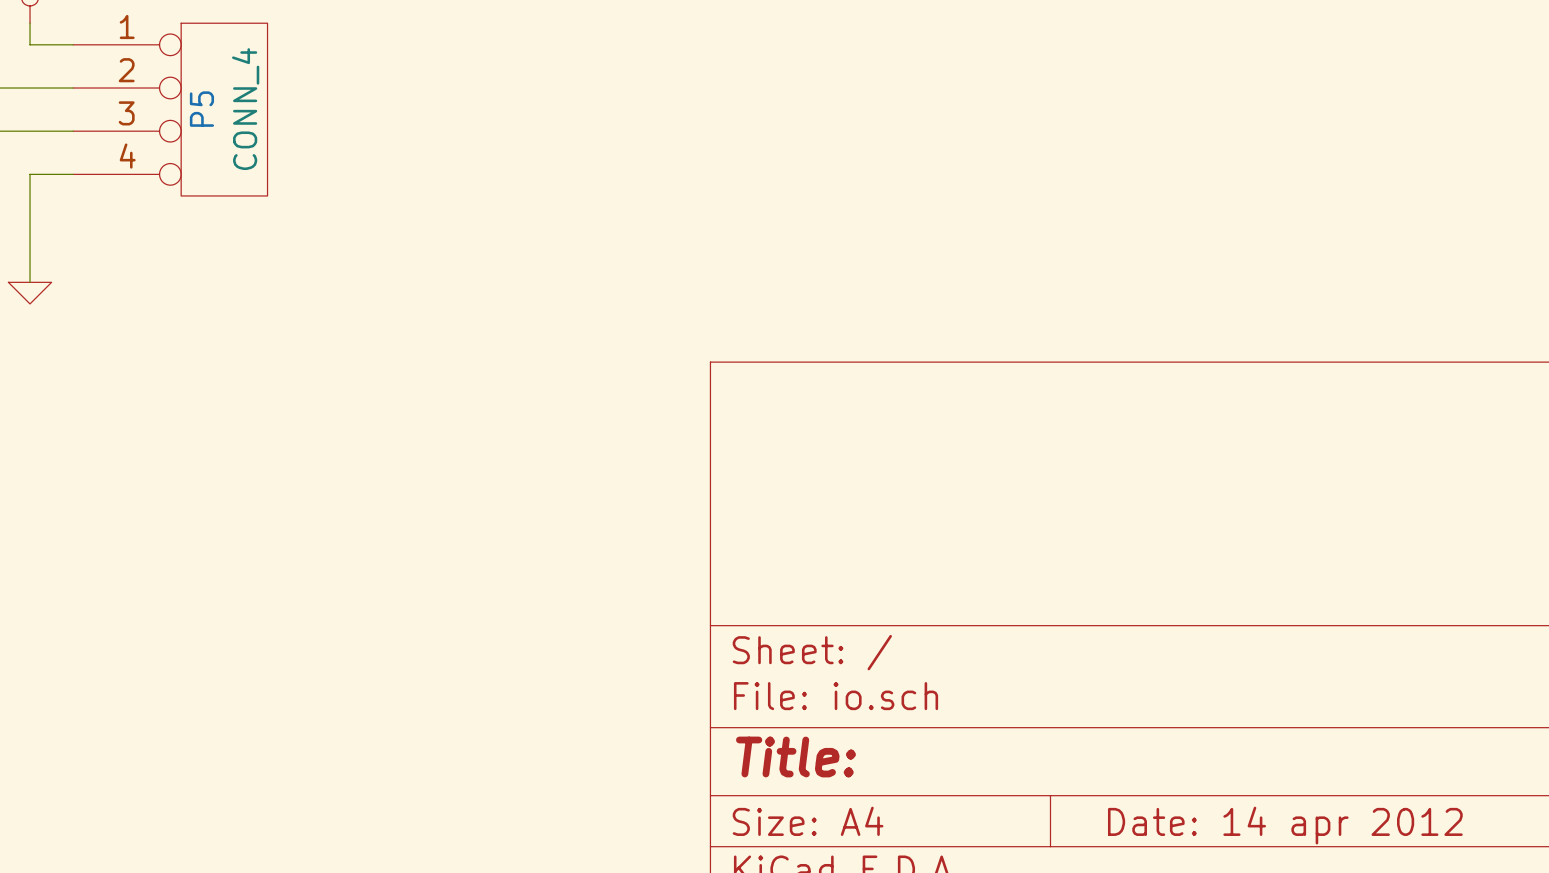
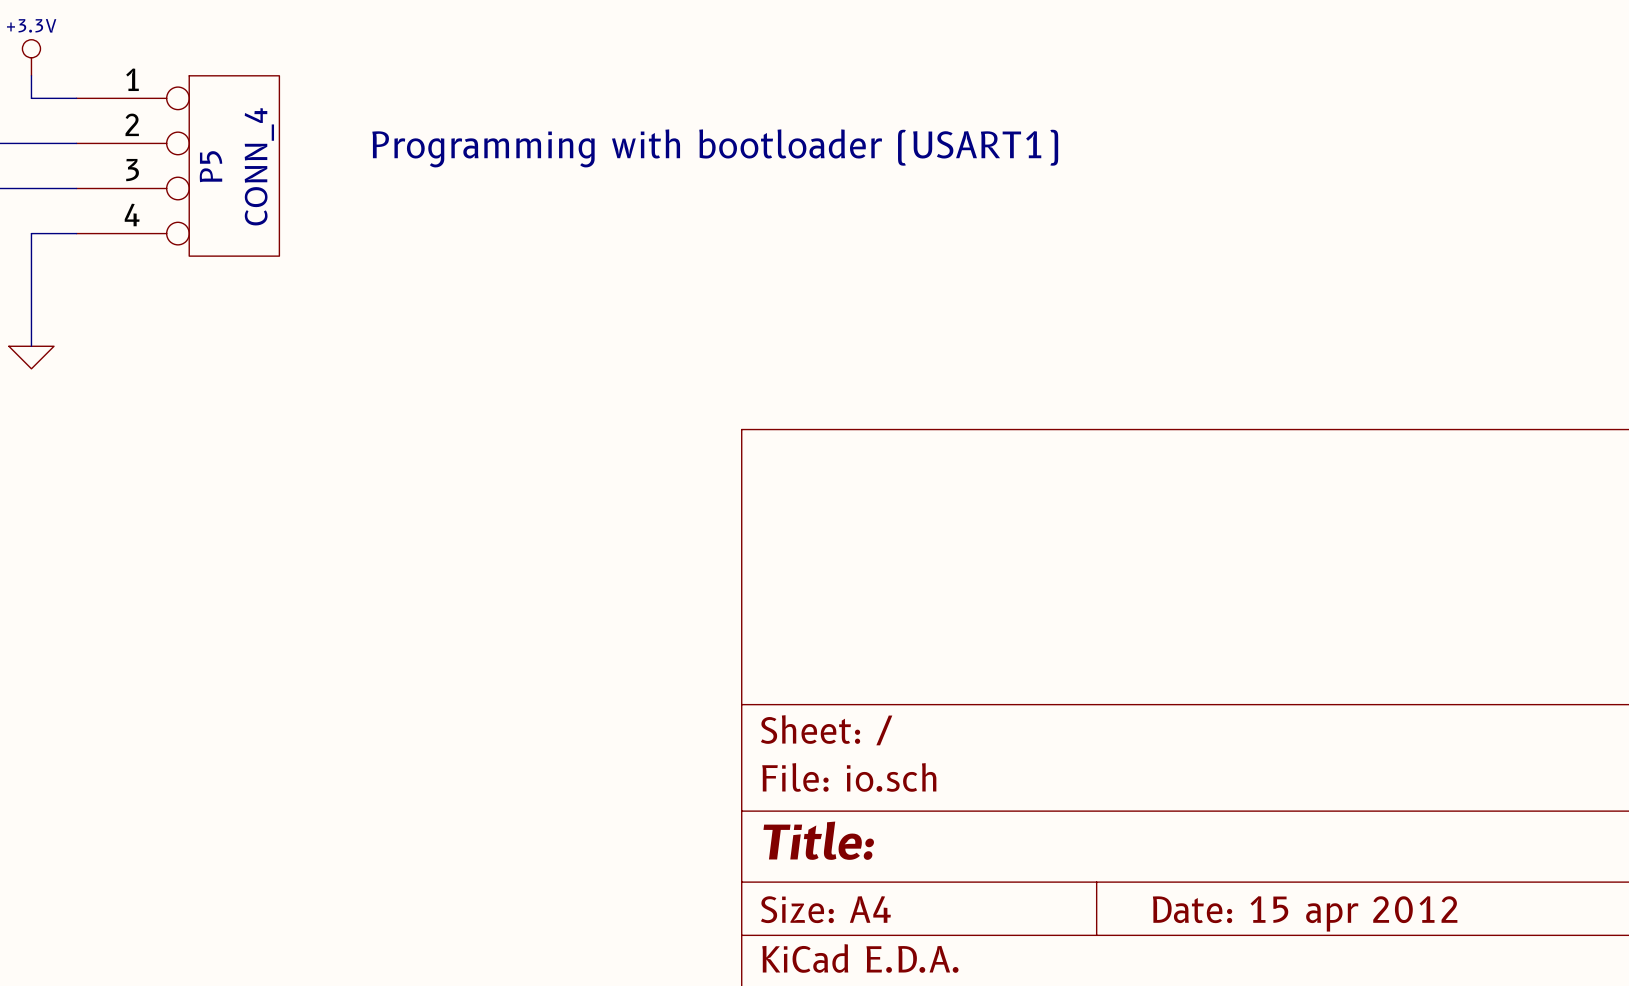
text: none -> Programming with bootloader (USART1) (715, 148)
title block: Date: 14 apr 2012 (1285, 825) -> Date: 15 apr 2012 (1305, 913)

